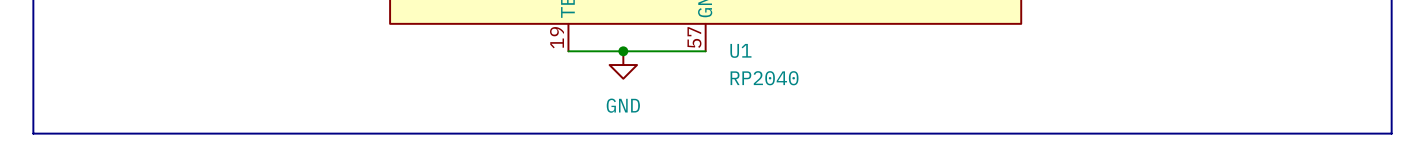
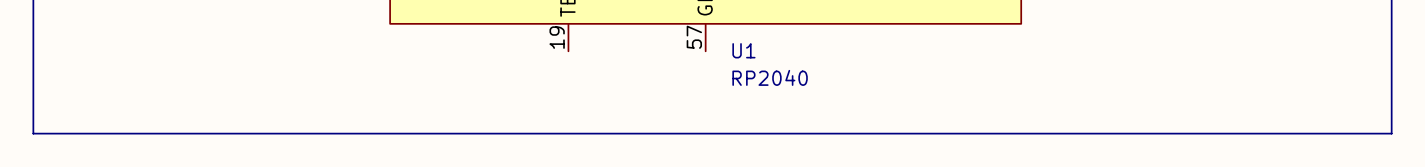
wire: (568, 51) (705, 51) -> none
junction: (623, 51) -> none
power symbol: GND (623, 65) -> none

